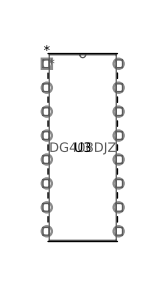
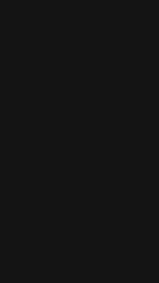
U3: DG408DJZ (82, 147) -> none

